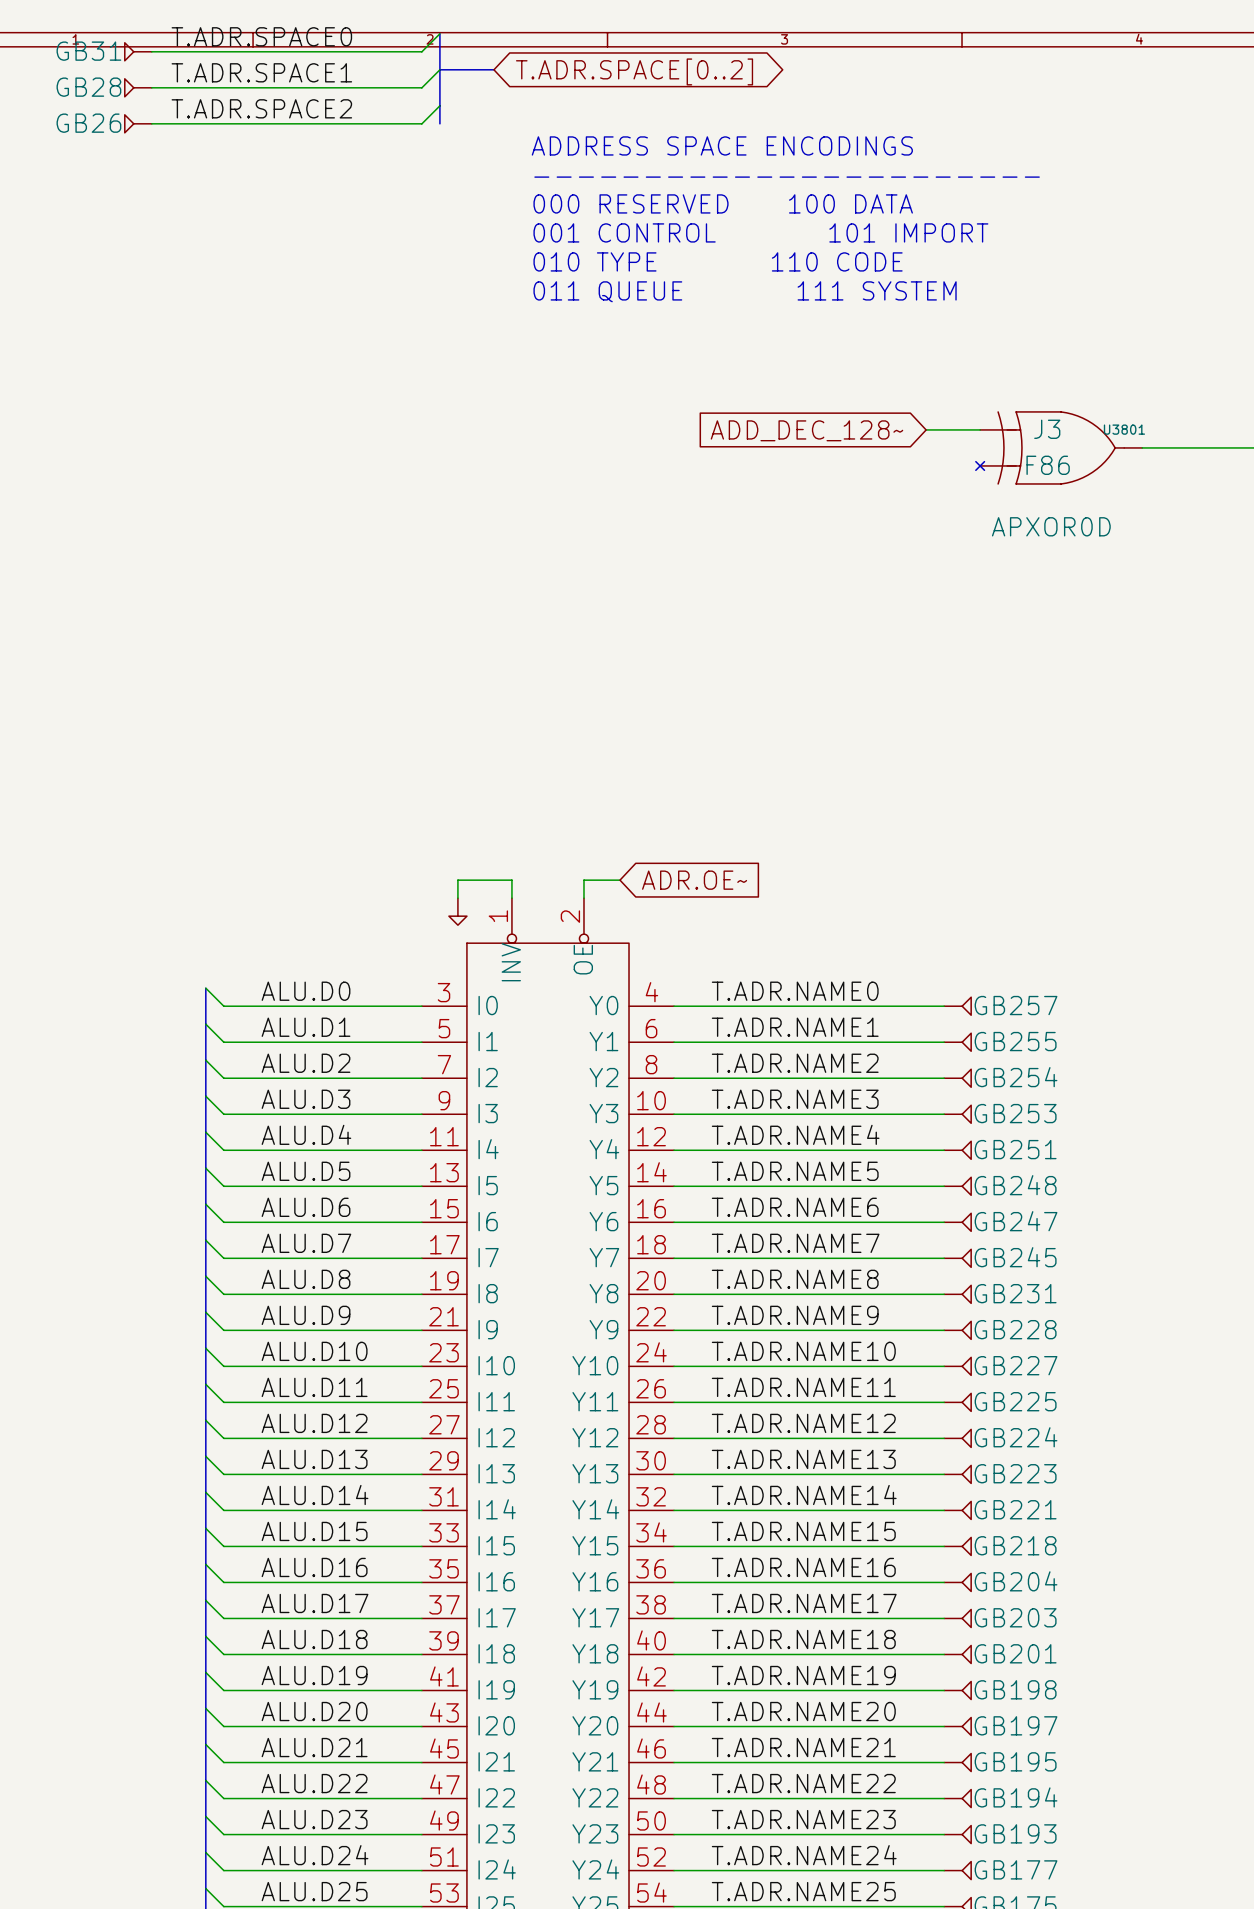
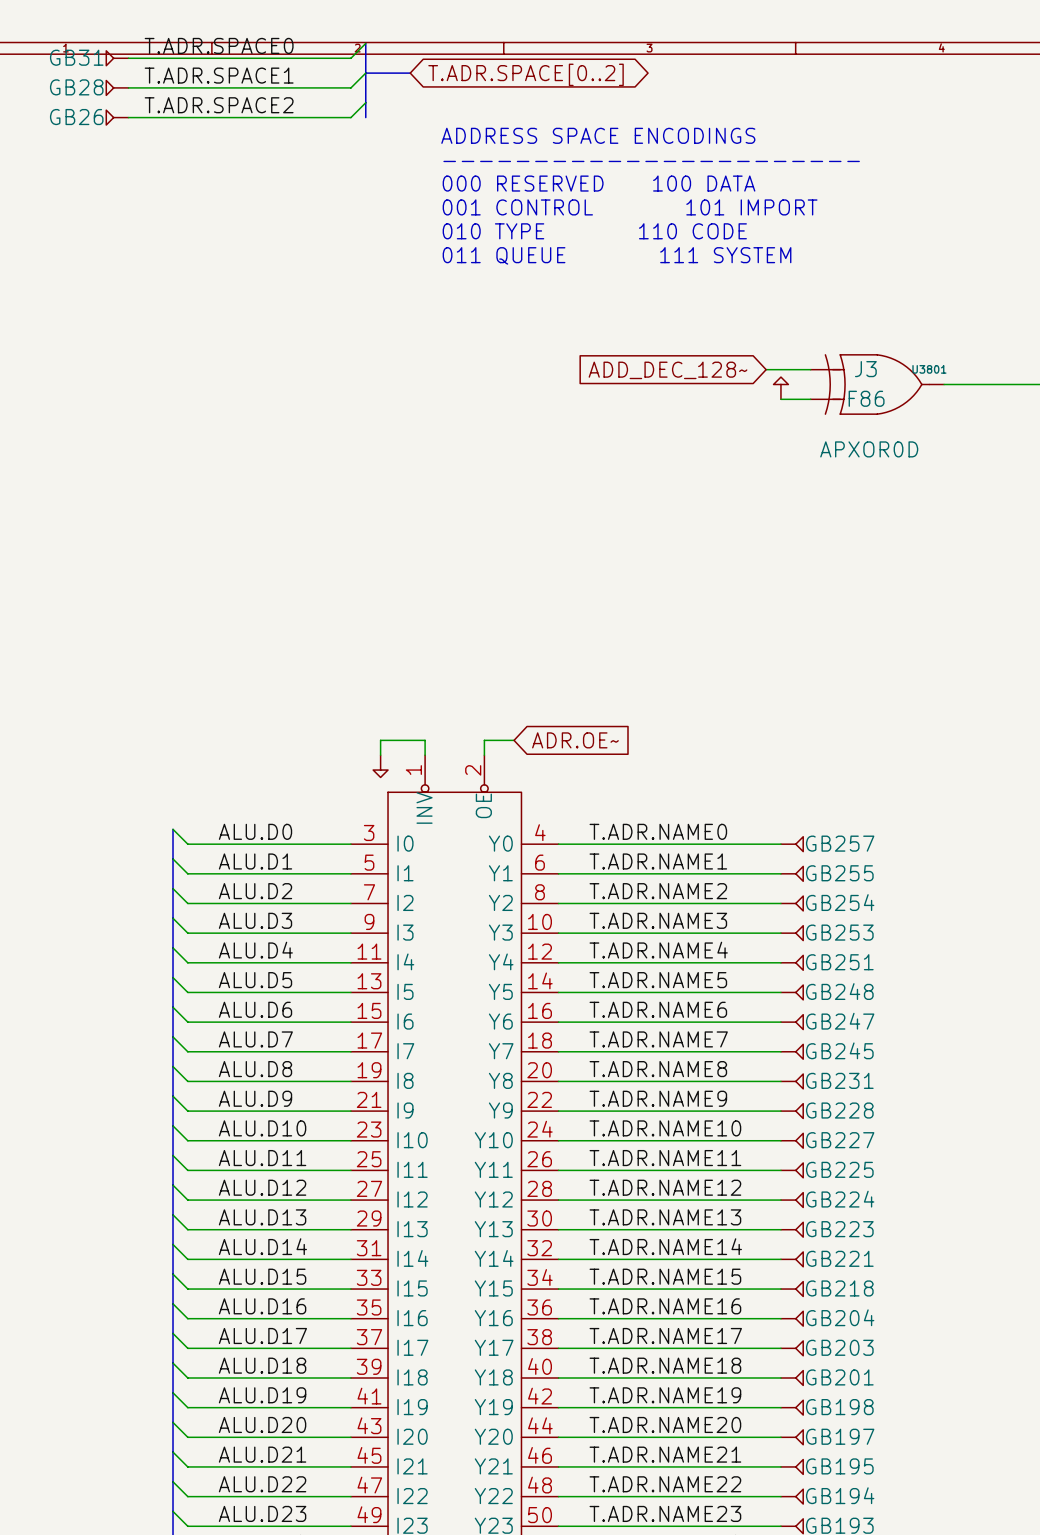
power symbol: none -> (780, 387)
wire: none -> (780, 399) (810, 399)
no-connect mark: (980, 465) -> none

